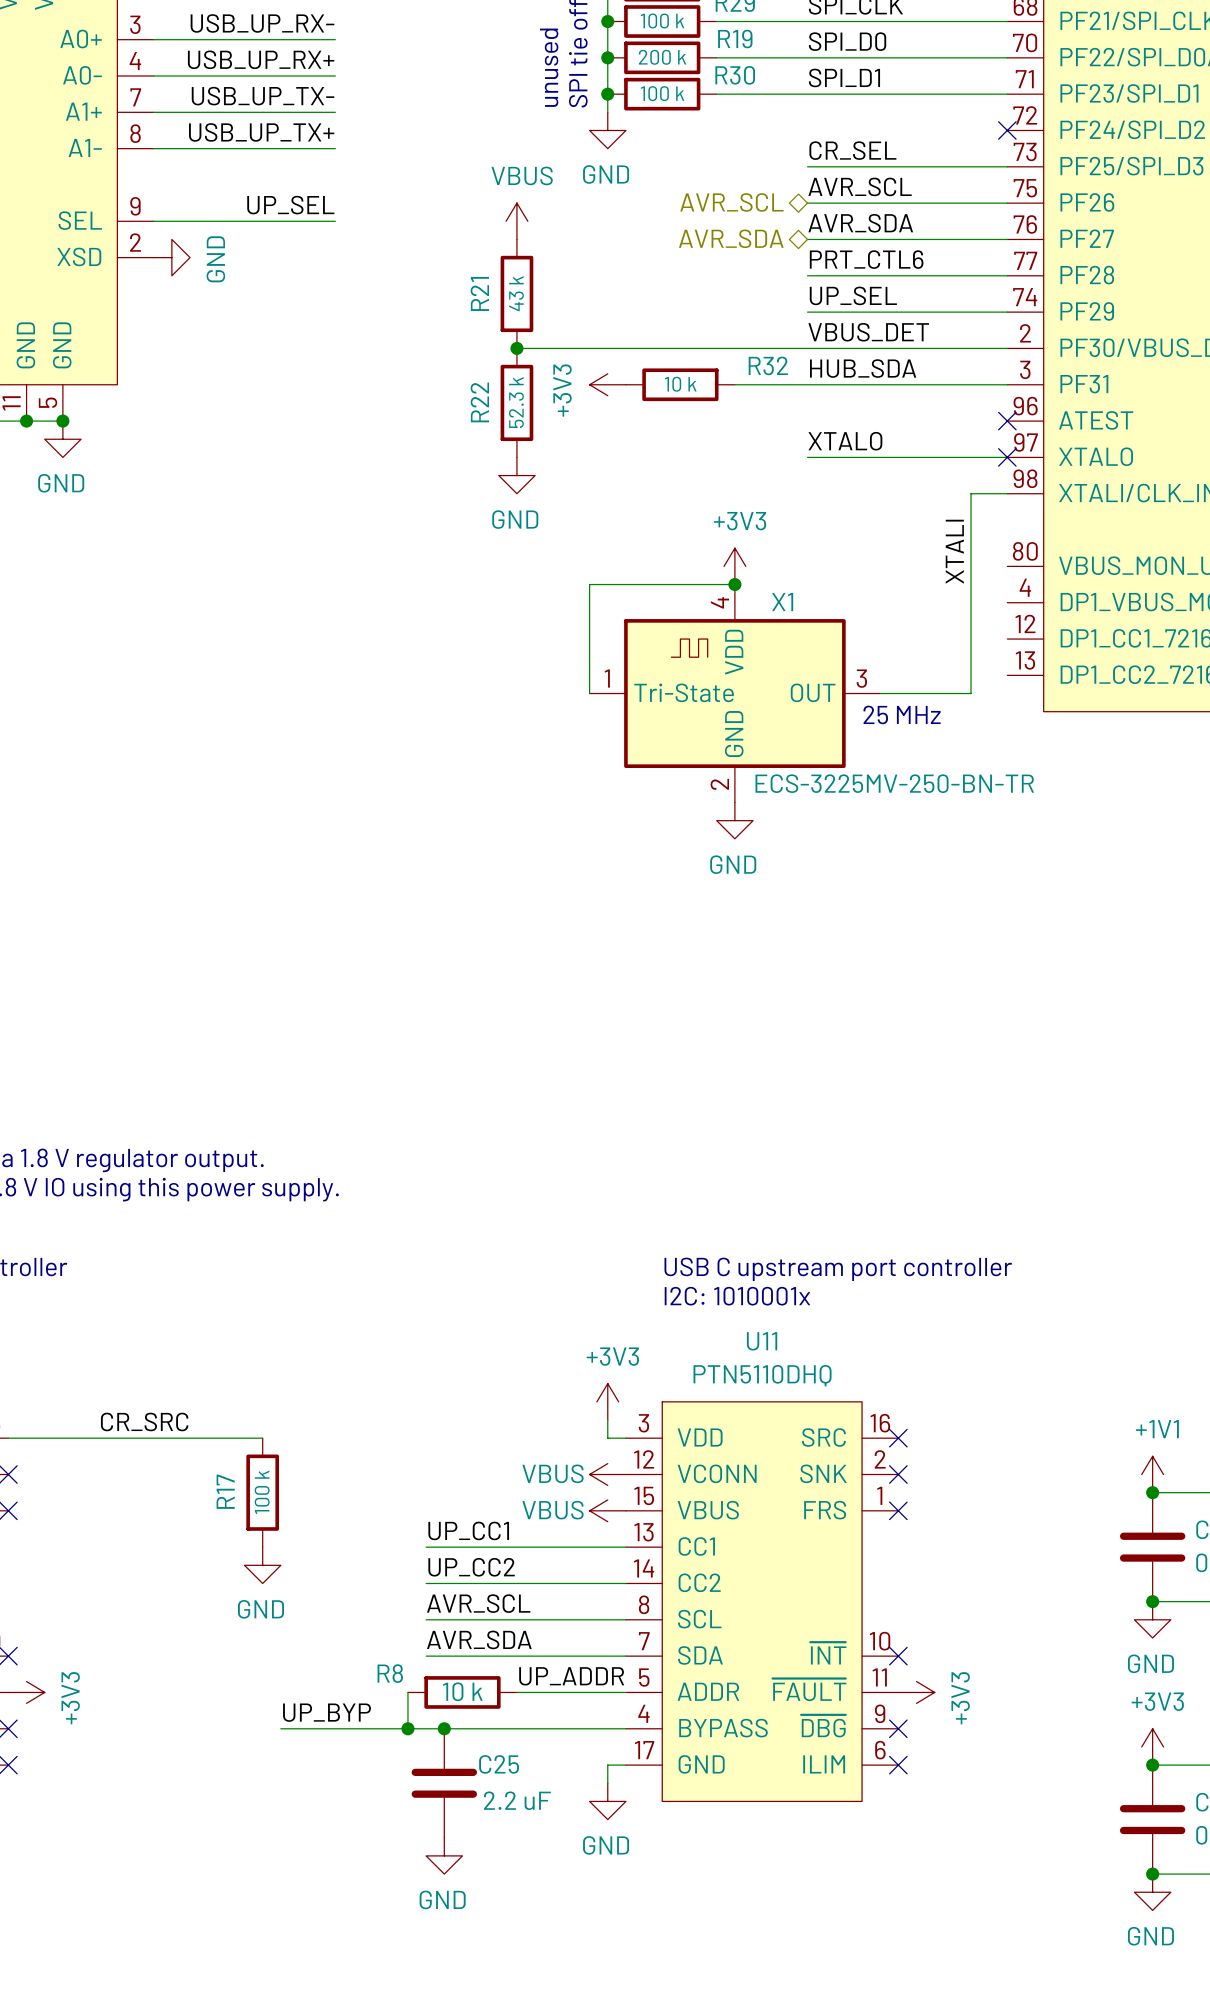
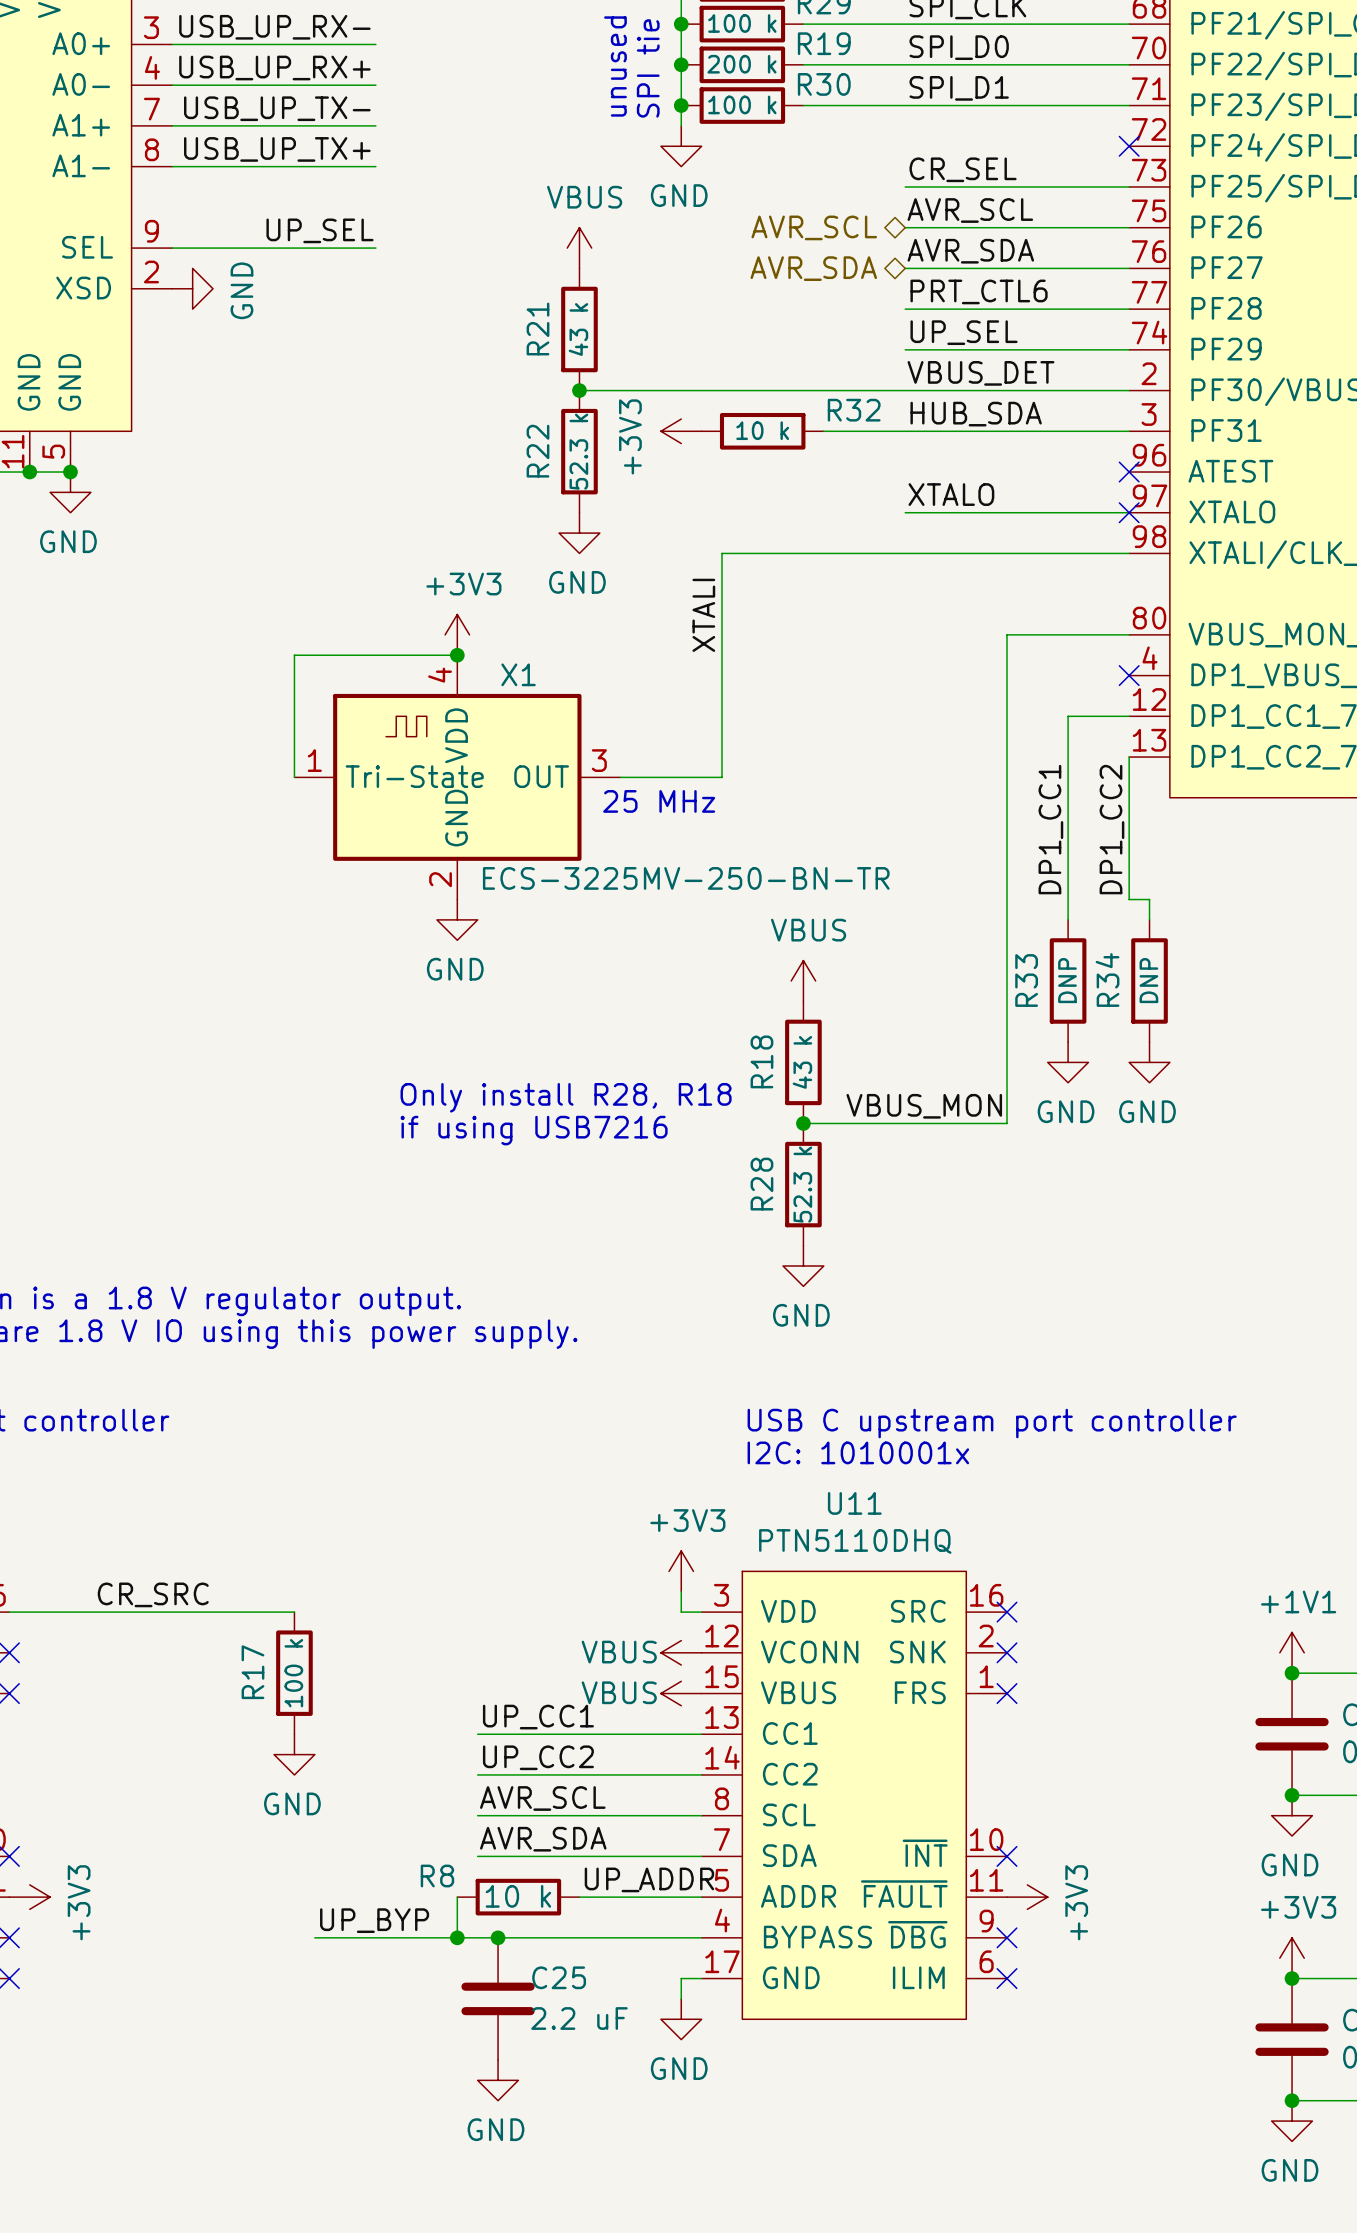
wire: (971, 493) (971, 693) (880, 693) -> (1088, 553) (721, 553) (721, 777) (620, 777)
label position: XTALI (954, 551) -> XTALI (703, 615)
power symbol position: +3V3 (734, 566) -> +3V3 (457, 634)
wire: none -> (1129, 634) (1007, 634) (1007, 1123) (803, 1123)
junction: none -> (457, 655)
wire: (734, 584) (589, 584) (589, 693) -> (457, 655) (294, 655) (294, 777)
junction: (734, 584) -> none
no-connect mark: none -> (1129, 675)
wire: none -> (1129, 716) (1068, 716) (1068, 919)
wire: none -> (1129, 757) (1129, 899) (1149, 899) (1149, 919)
X1 position: (734, 693) -> (457, 777)
text position: 25 MHz (902, 714) -> 25 MHz (659, 801)
label: none -> DP1_CC2 (1111, 829)
label: none -> DP1_CC1 (1050, 829)
power symbol: none -> GND (457, 919)
power symbol: GND (734, 820) -> none
power symbol: none -> VBUS (803, 980)
R33: none -> DNP (1068, 980)
R34: none -> DNP (1149, 980)
R18: none -> 43 k (803, 1062)
power symbol: none -> GND (1068, 1062)
power symbol: none -> GND (1149, 1062)
text: none -> Only install R28, R18 (566, 1097)
label: none -> VBUS_MON (924, 1106)
junction: none -> (803, 1123)
text: none -> if using USB7216 (534, 1130)
R28: none -> 52.3 k (803, 1184)
power symbol: none -> GND (803, 1266)

